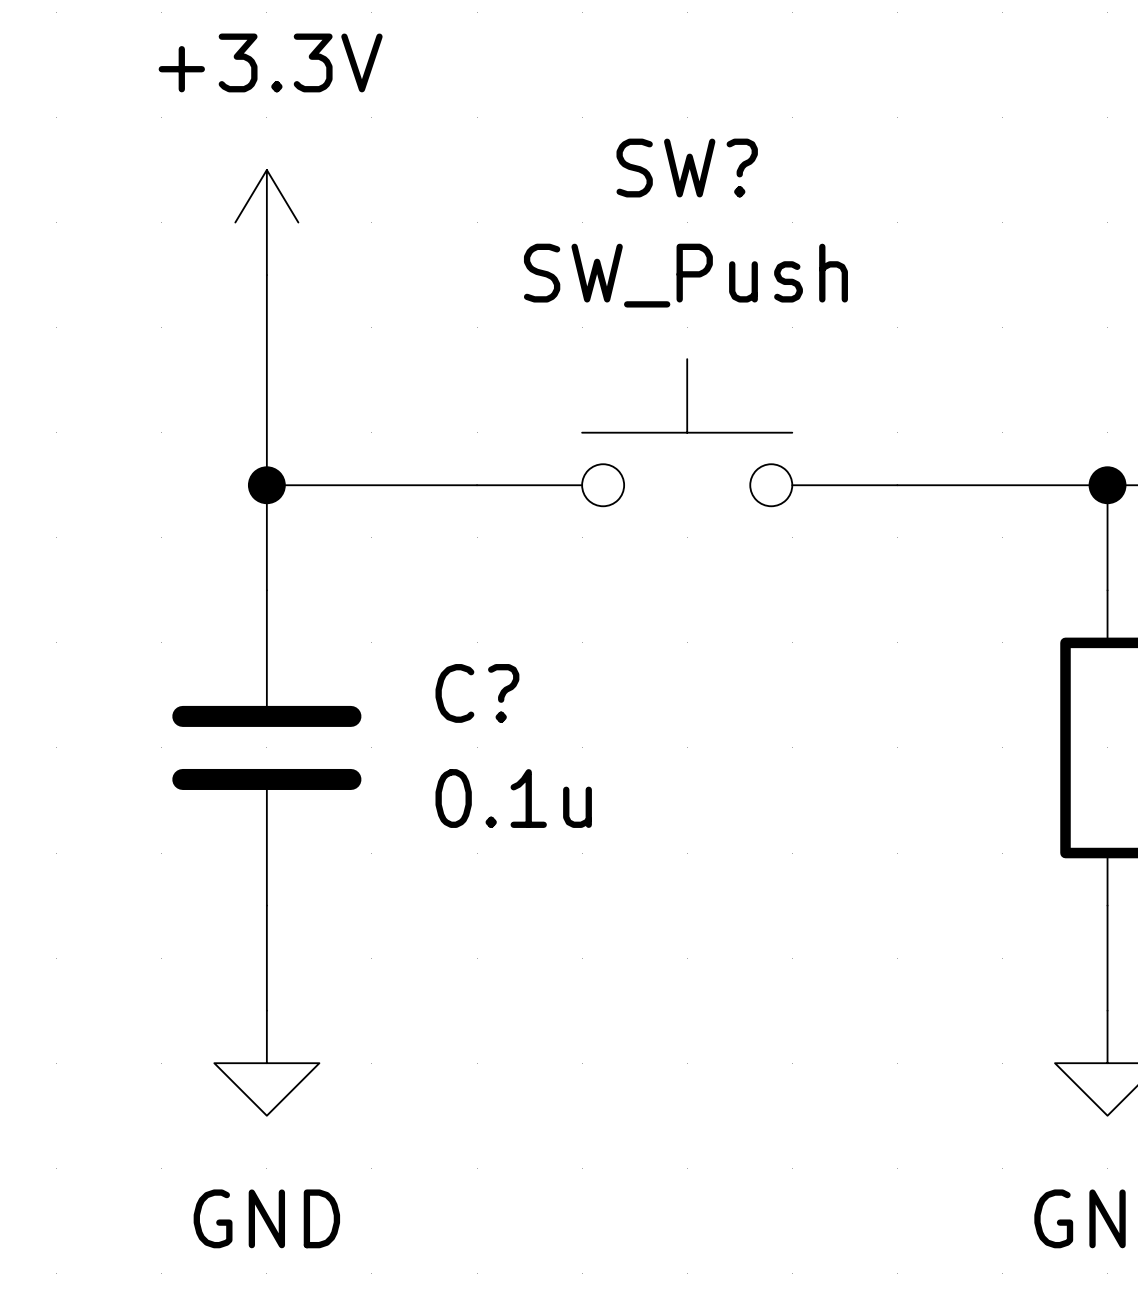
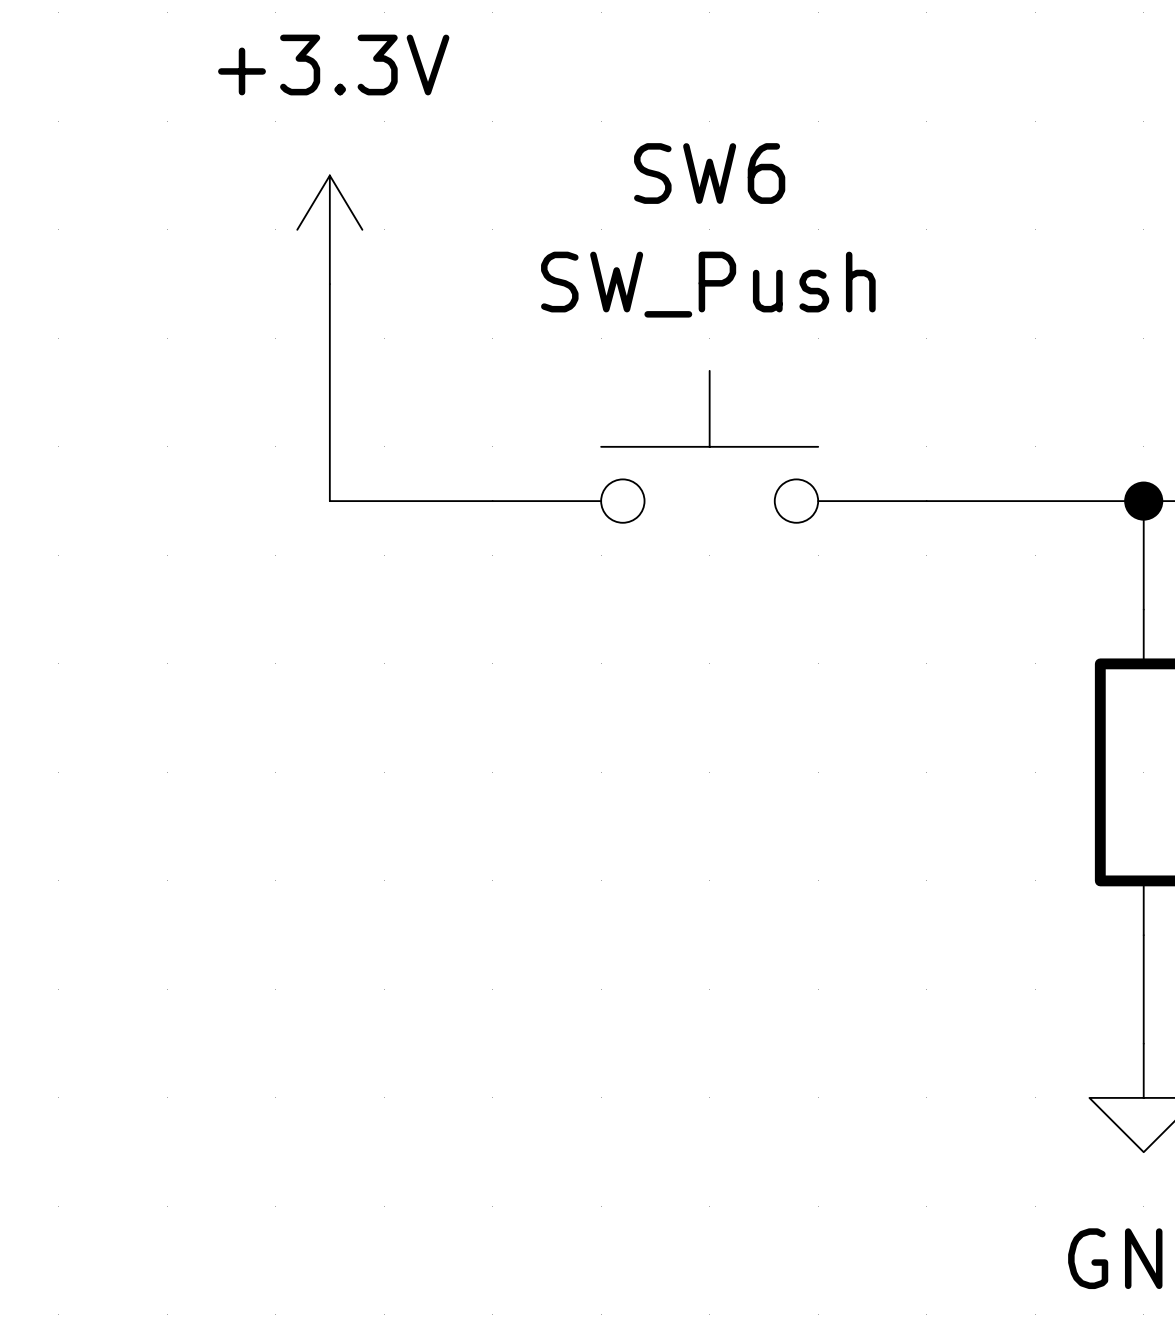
SW? name: SW? (687, 168) -> SW6 (709, 173)
power symbol position: +3.3V (266, 222) -> +3.3V (329, 229)
wire: (266, 275) (266, 590) -> none
wire: (266, 485) (319, 485) -> (329, 284) (329, 501)
junction: (266, 485) -> none
C?: 0.1u (266, 747) -> none
wire: (266, 905) (266, 1010) -> none
power symbol: GND (266, 1063) -> none

